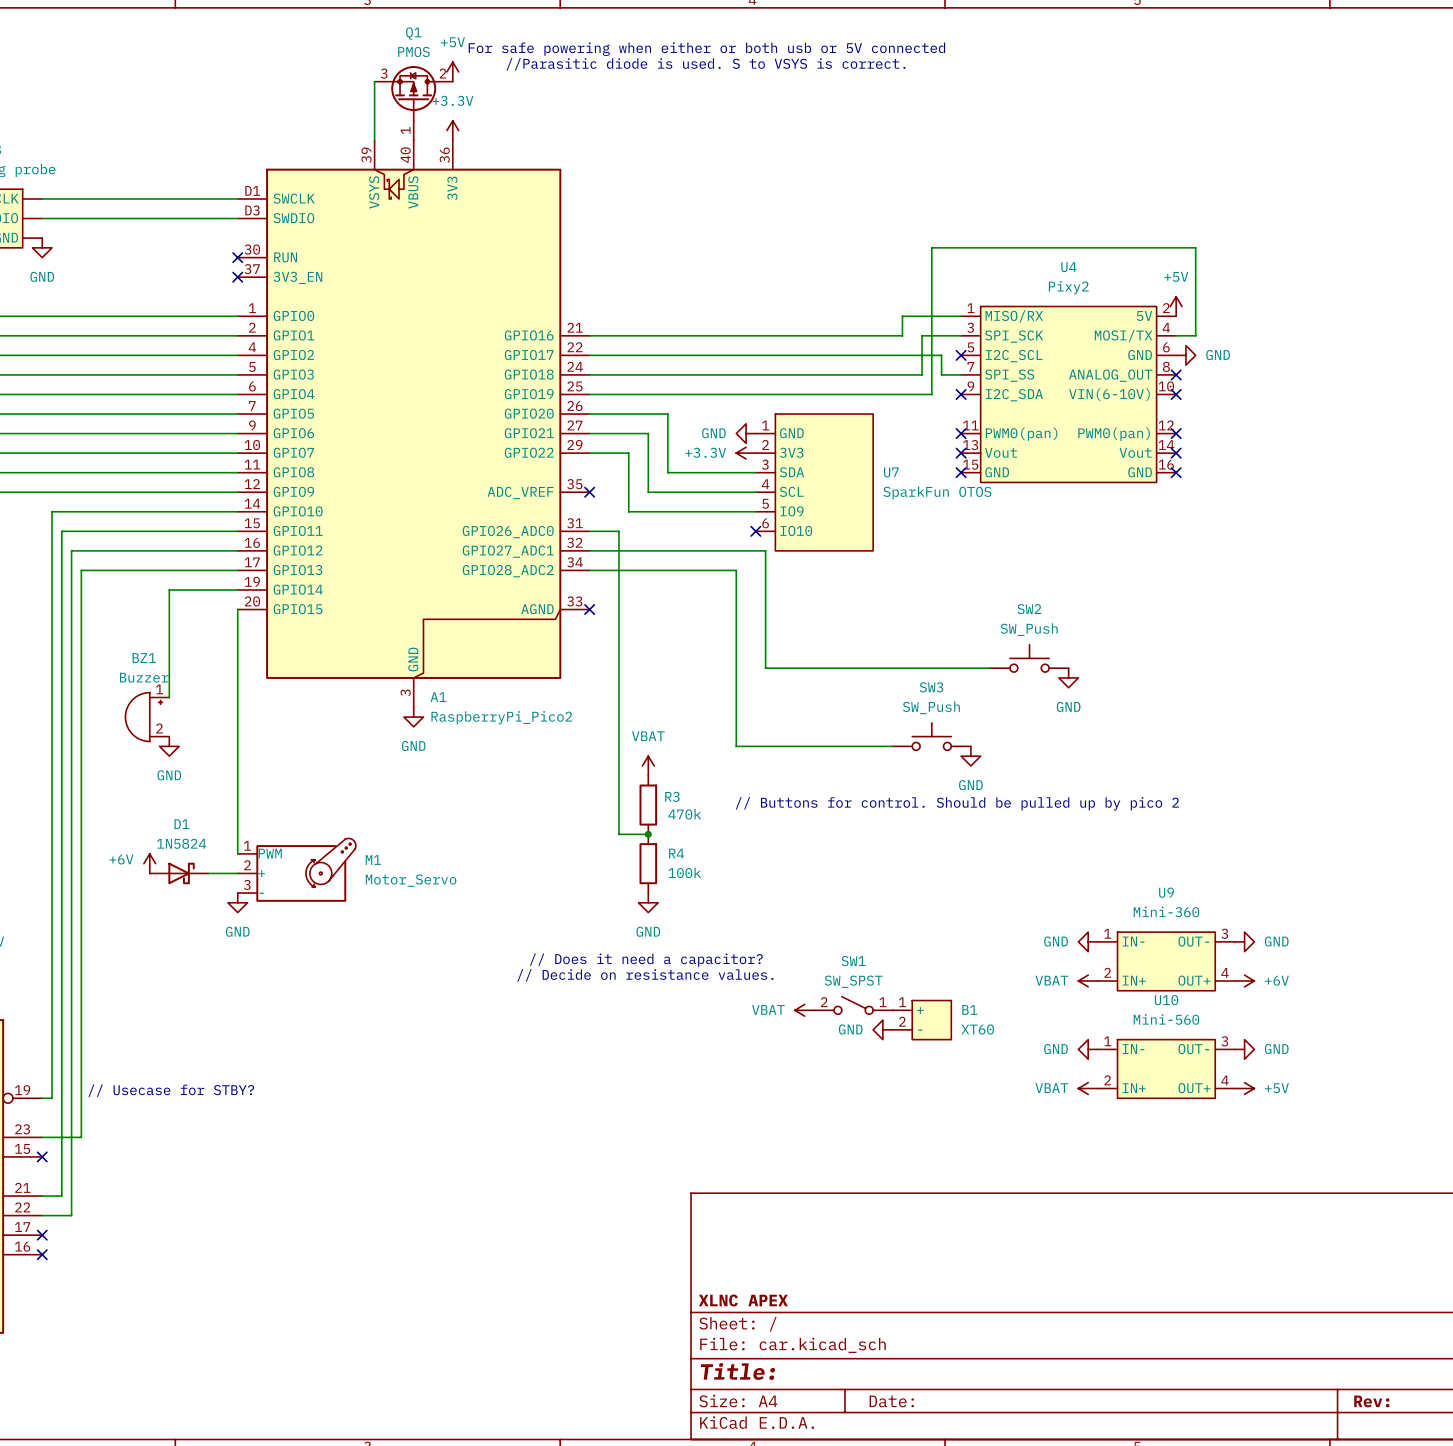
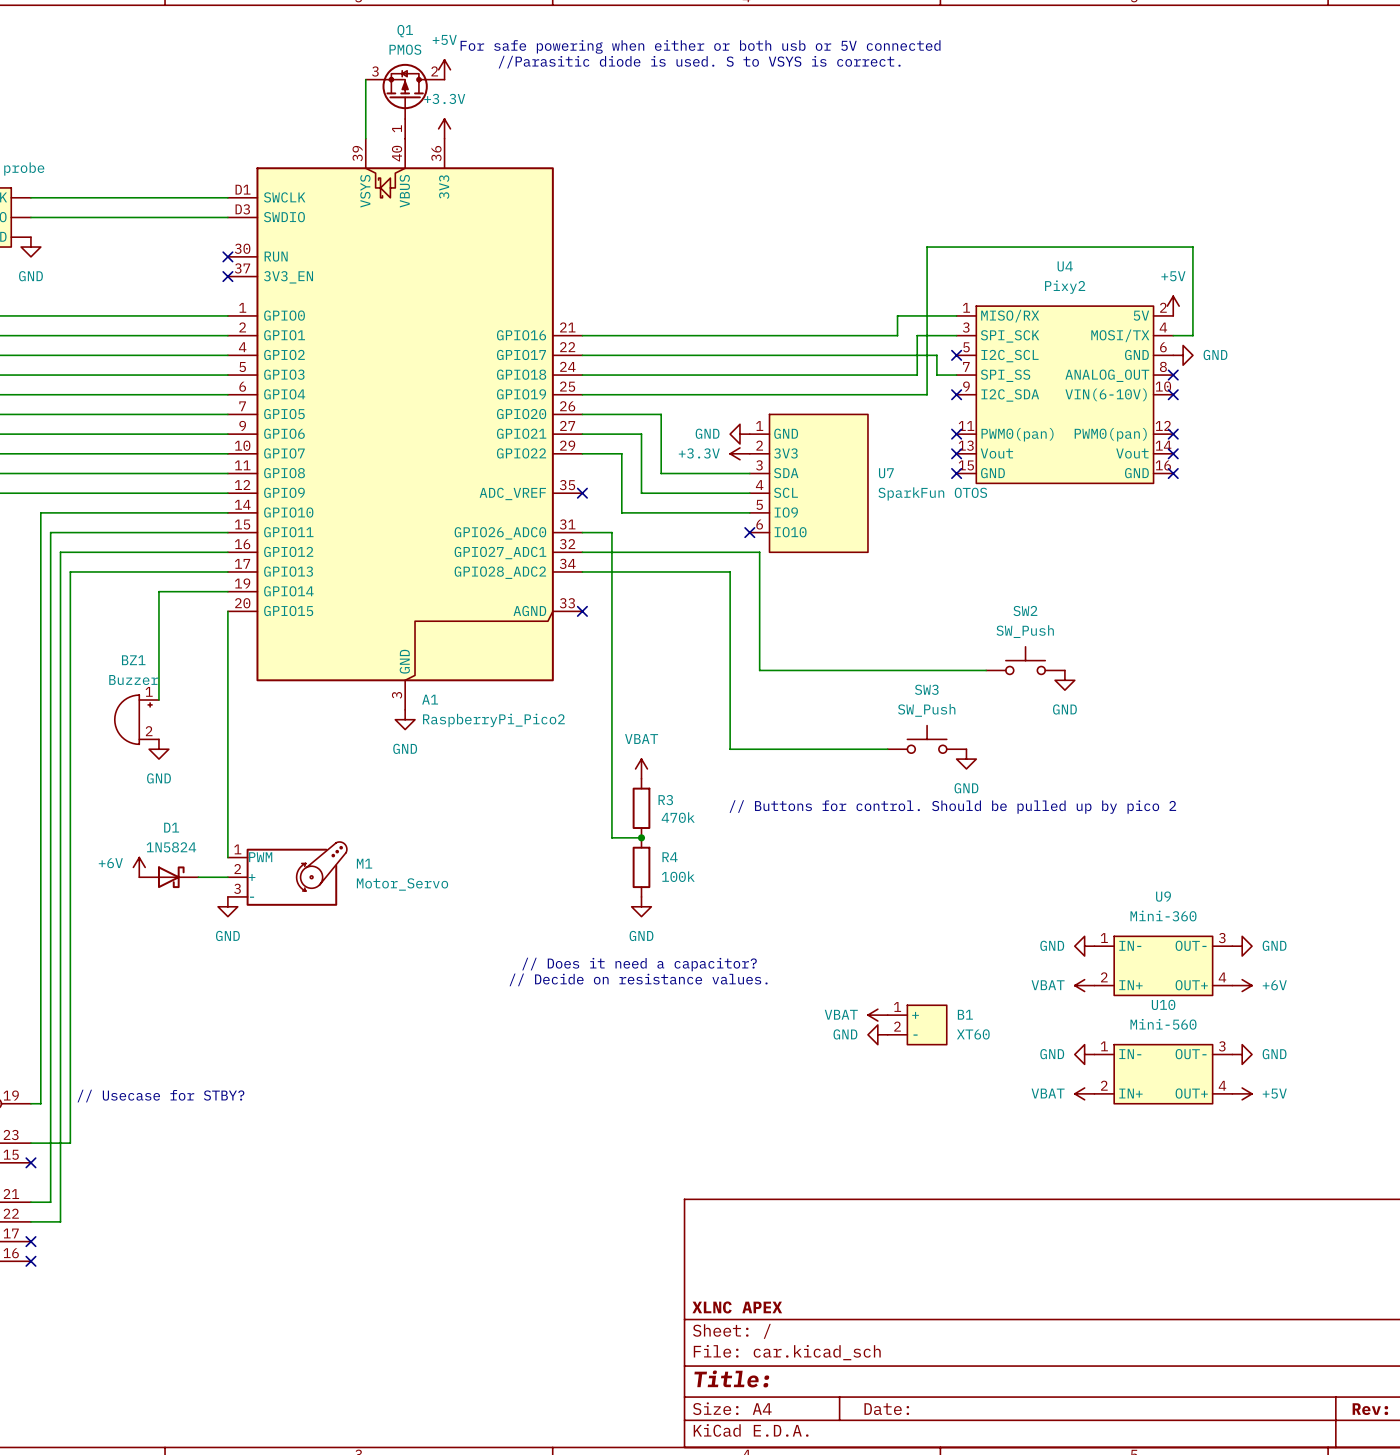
SW1: SW_SPST (853, 1005) -> none
power symbol position: VBAT (804, 1010) -> VBAT (877, 1015)

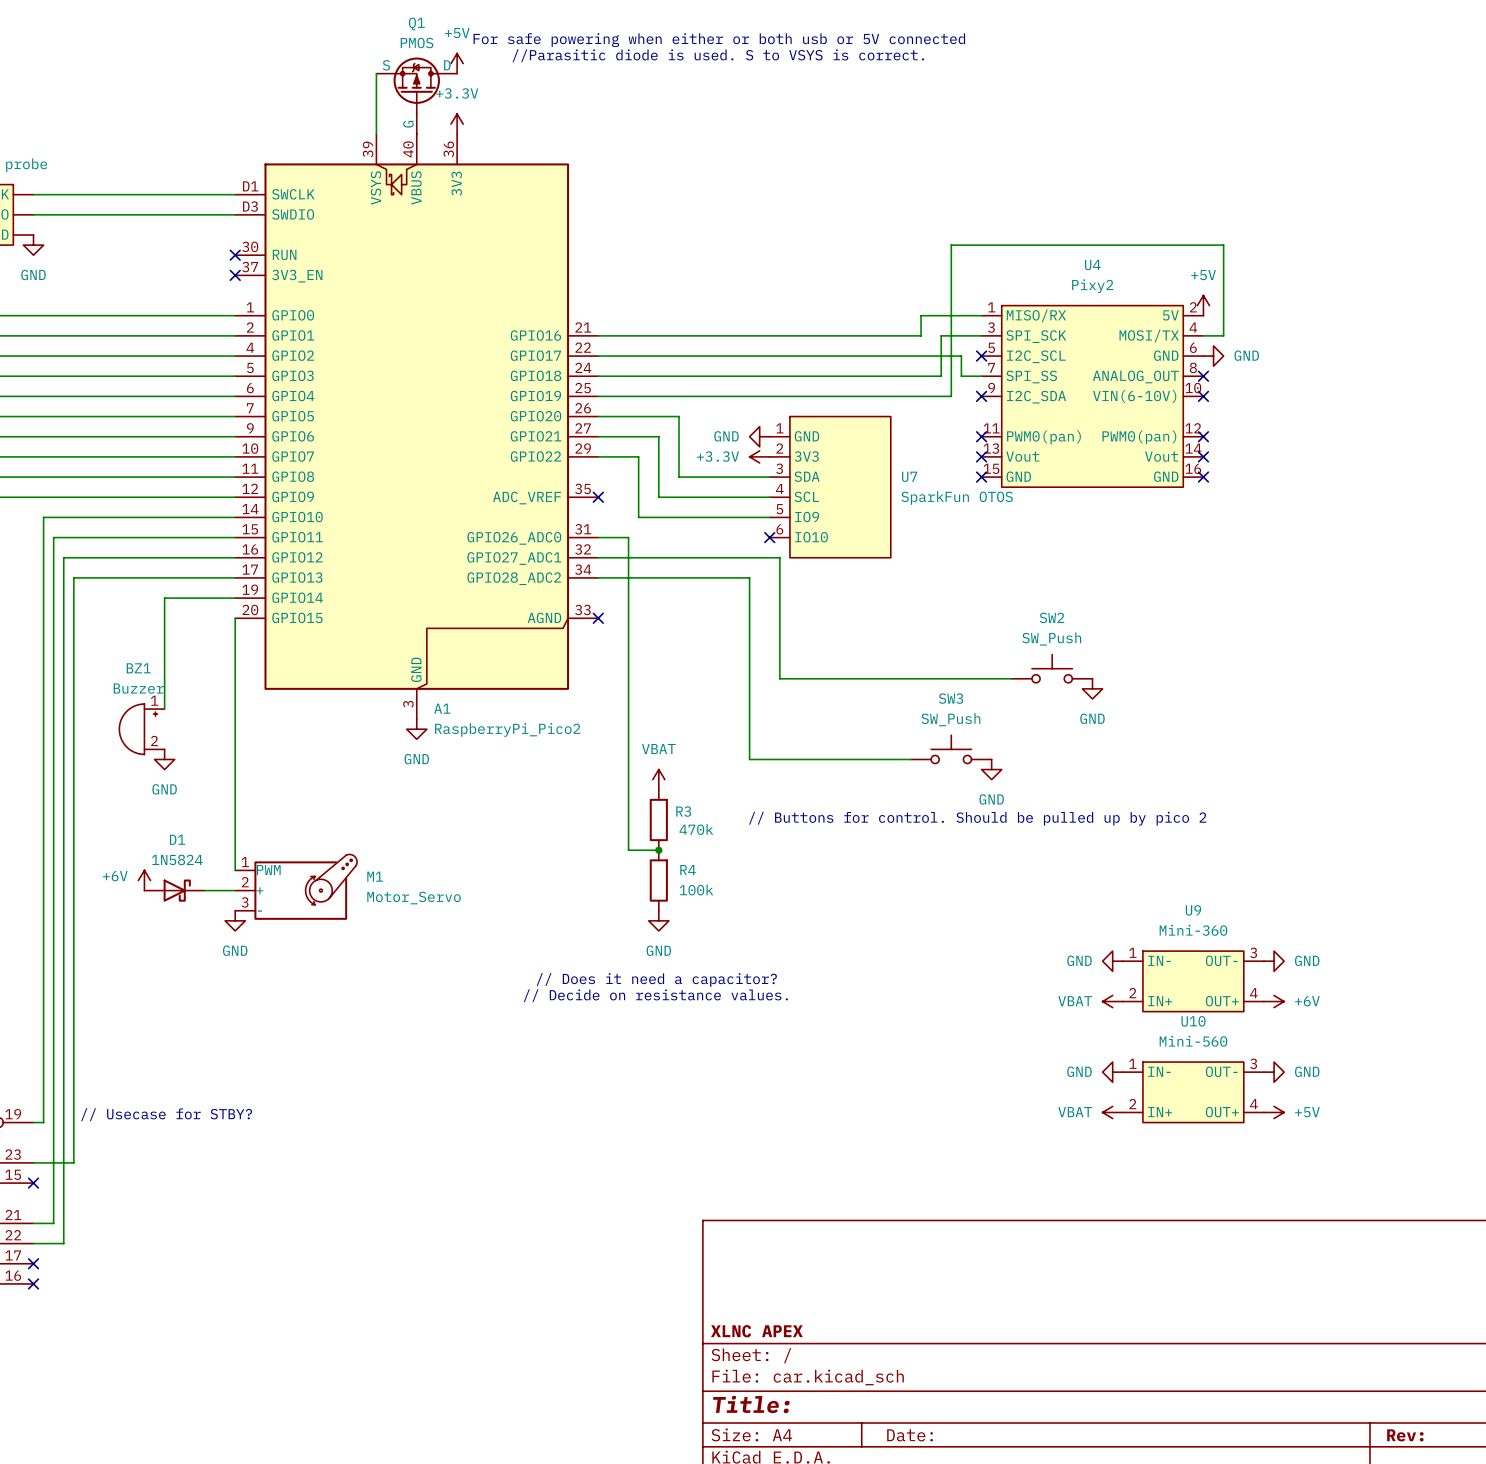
Q1 symbol: [365, 63, 445, 139] -> [376, 57, 458, 135]
power symbol: VBAT (877, 1015) -> none
B1: XT60 (917, 1024) -> none
power symbol: GND (877, 1034) -> none

